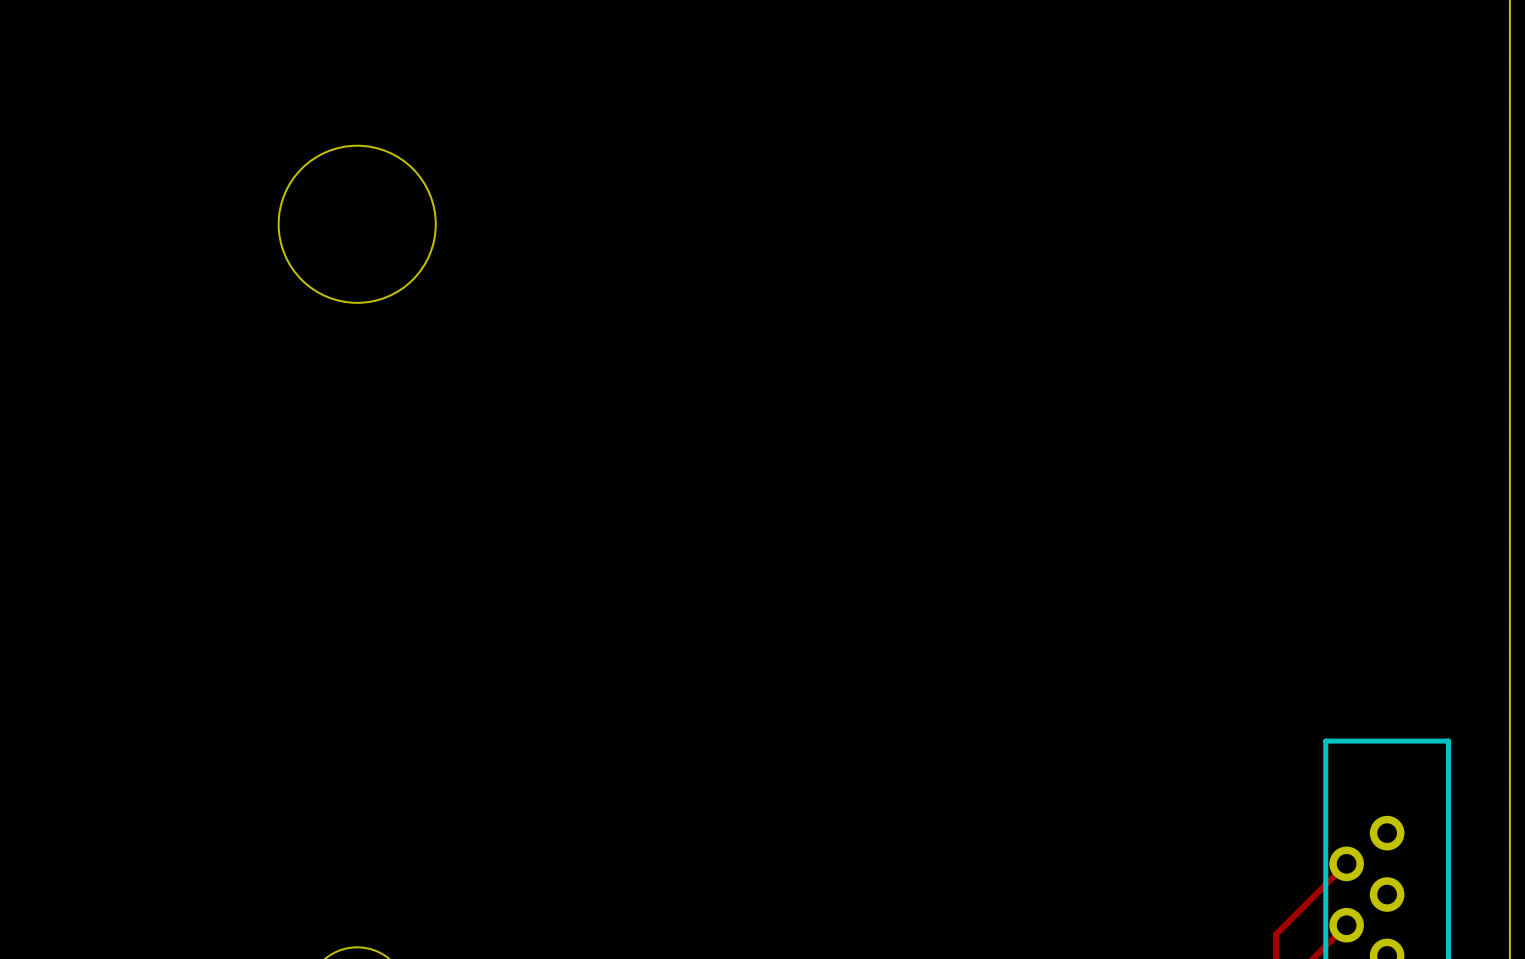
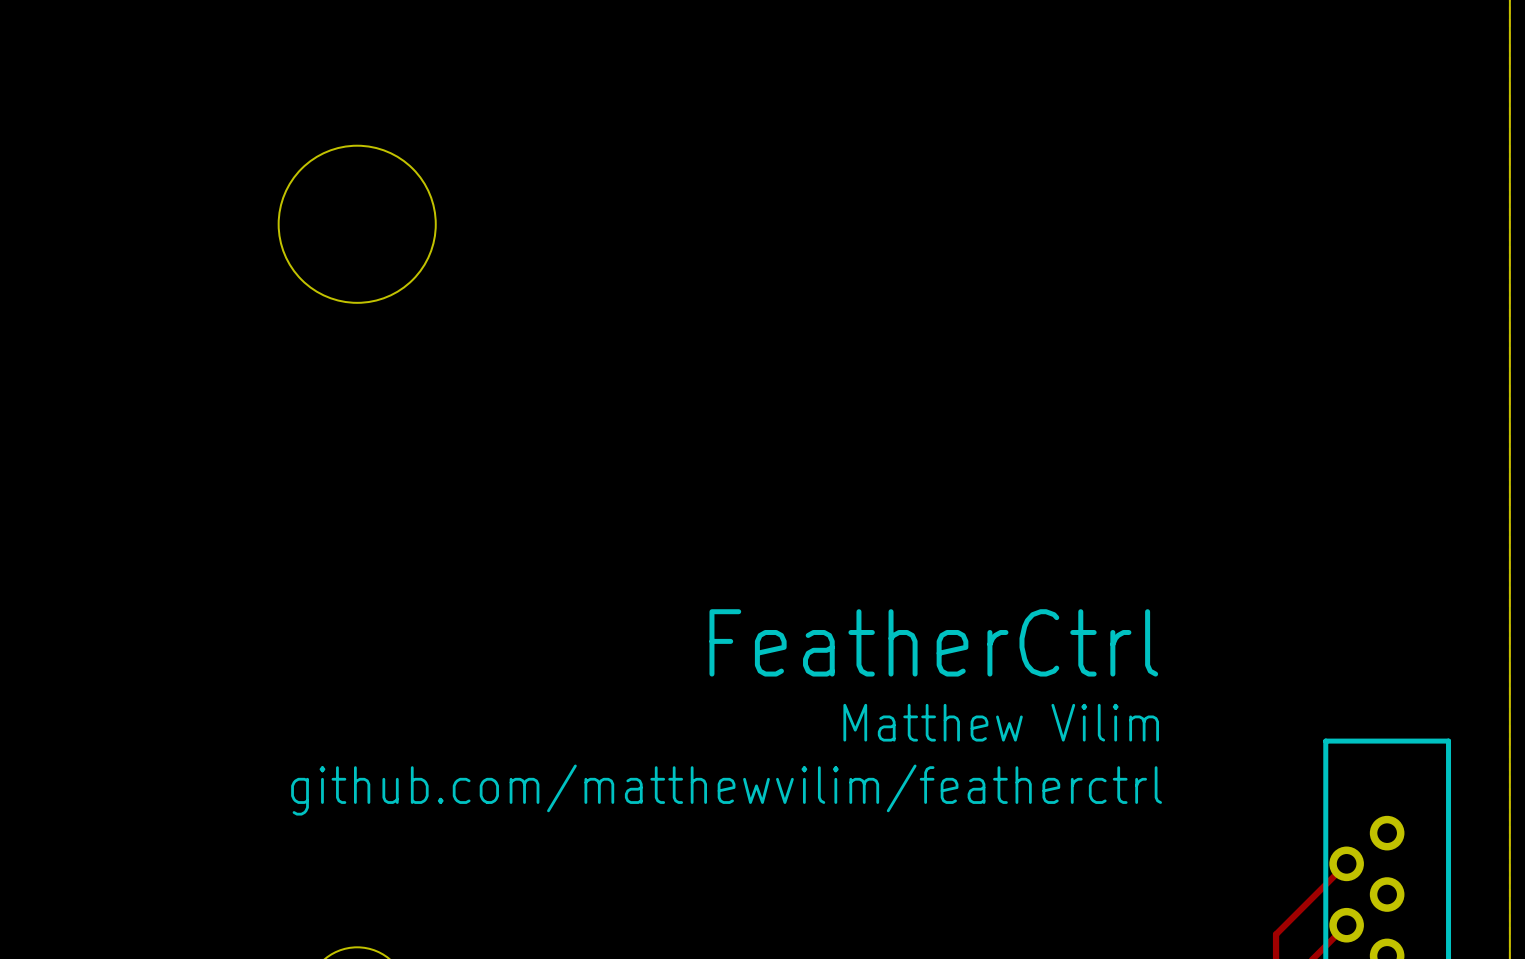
text: none -> FeatherCtrl (933, 642)
text: none -> Matthew Vilim (1001, 722)
text: none -> github.com/matthewvilim/featherctrl (726, 790)

